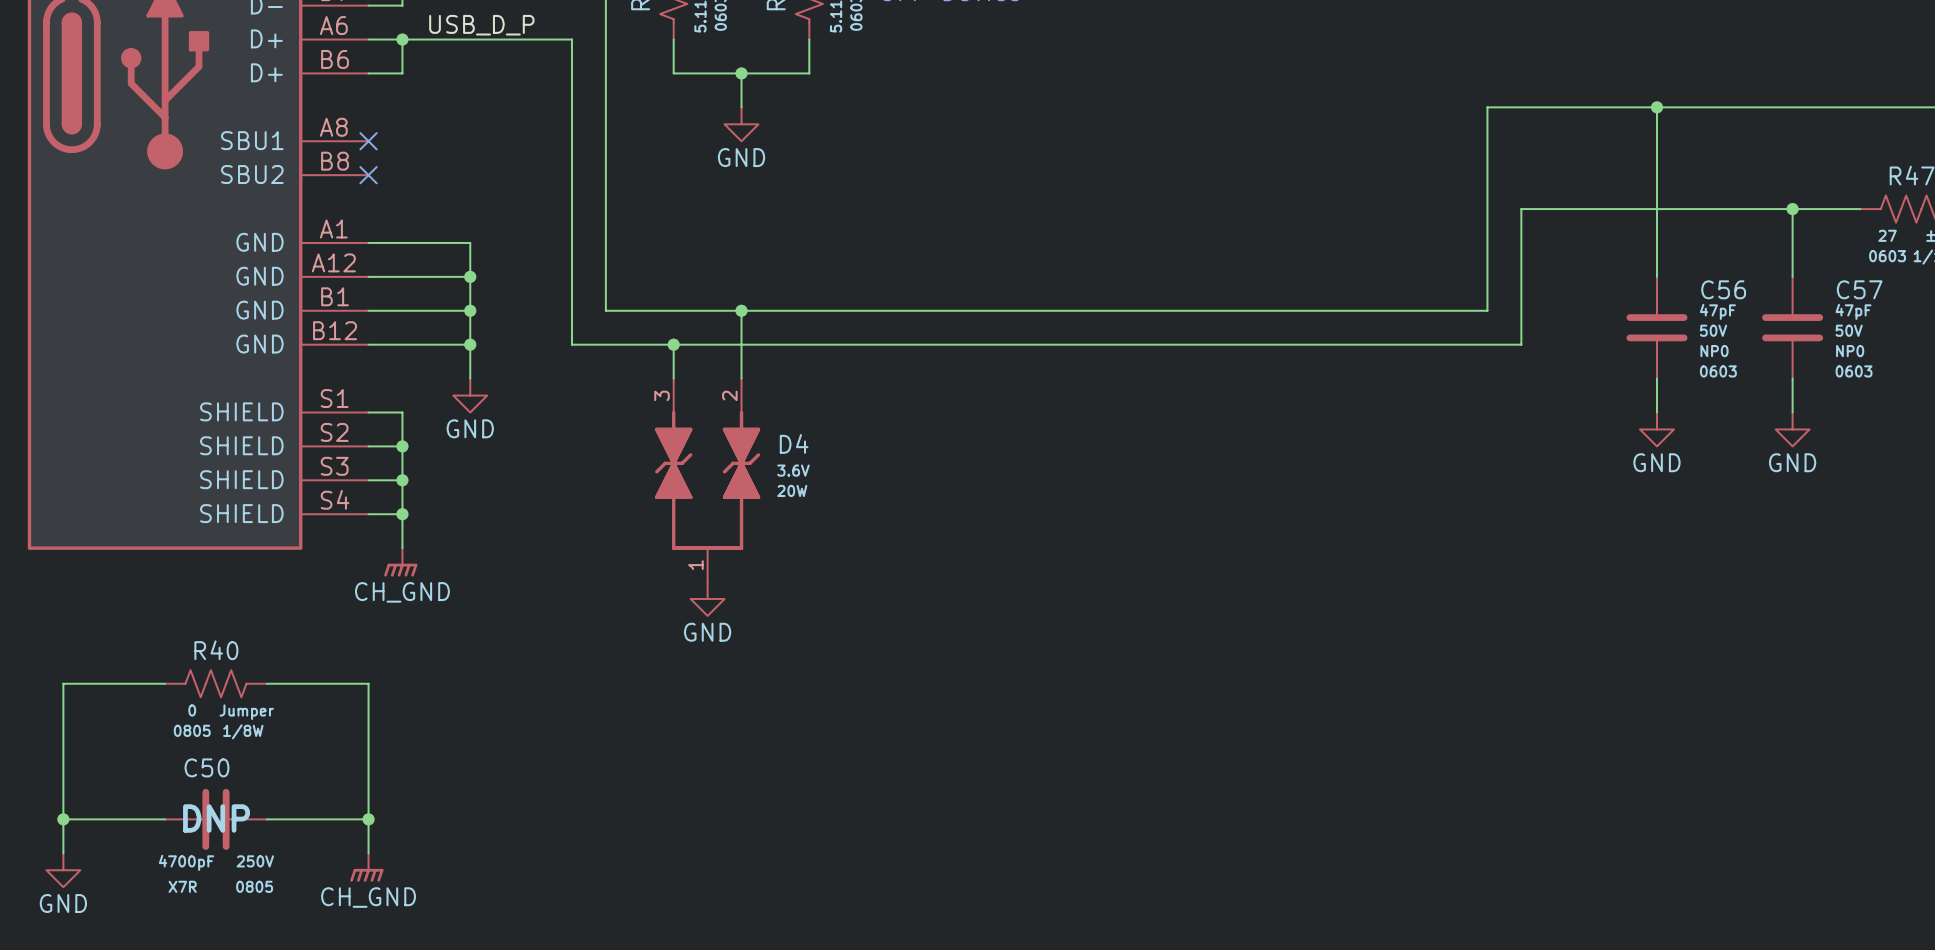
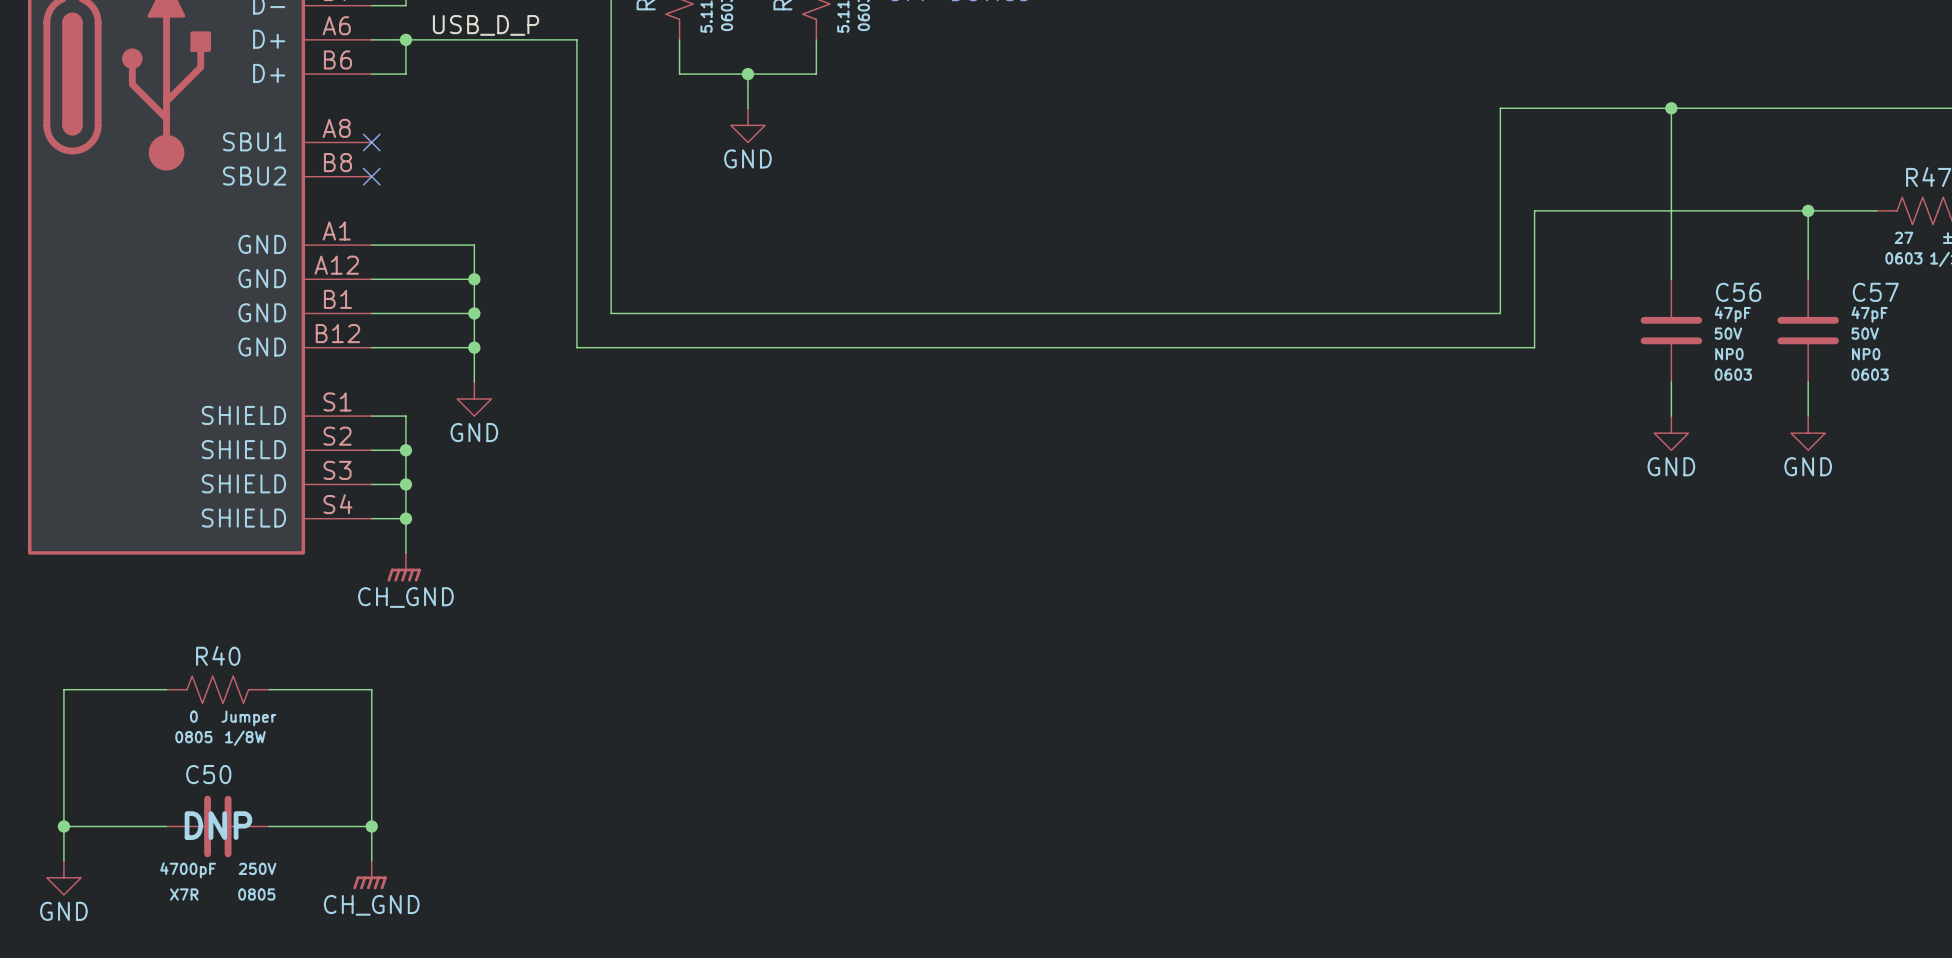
wire: (741, 310) (741, 378) -> none
junction: (741, 310) -> none
wire: (673, 344) (673, 378) -> none
junction: (673, 344) -> none
D4: (707, 480) -> none
power symbol: GND (707, 598) -> none

